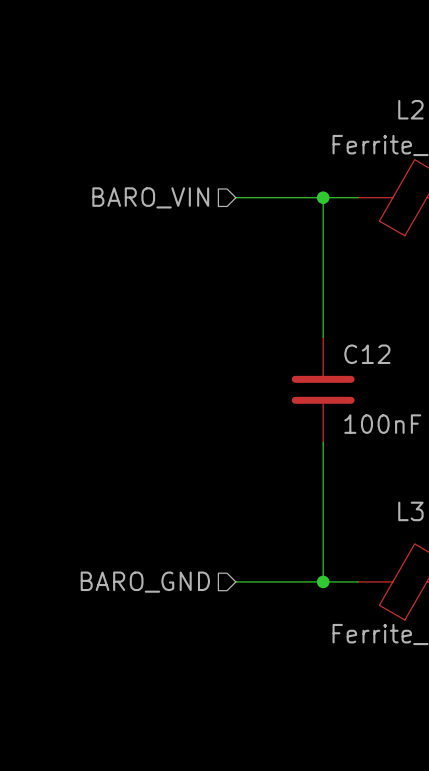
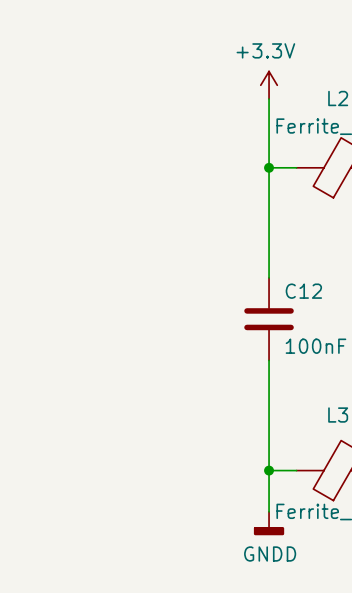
power symbol: none -> +3.3V (269, 85)
hierarchical label: BARO_VIN (150, 197) -> none
wire: (235, 197) (323, 197) -> (269, 99) (269, 167)
wire: (235, 581) (323, 581) -> (269, 511) (269, 470)
hierarchical label: BARO_GND (145, 582) -> none
power symbol: none -> GNDD (269, 523)

